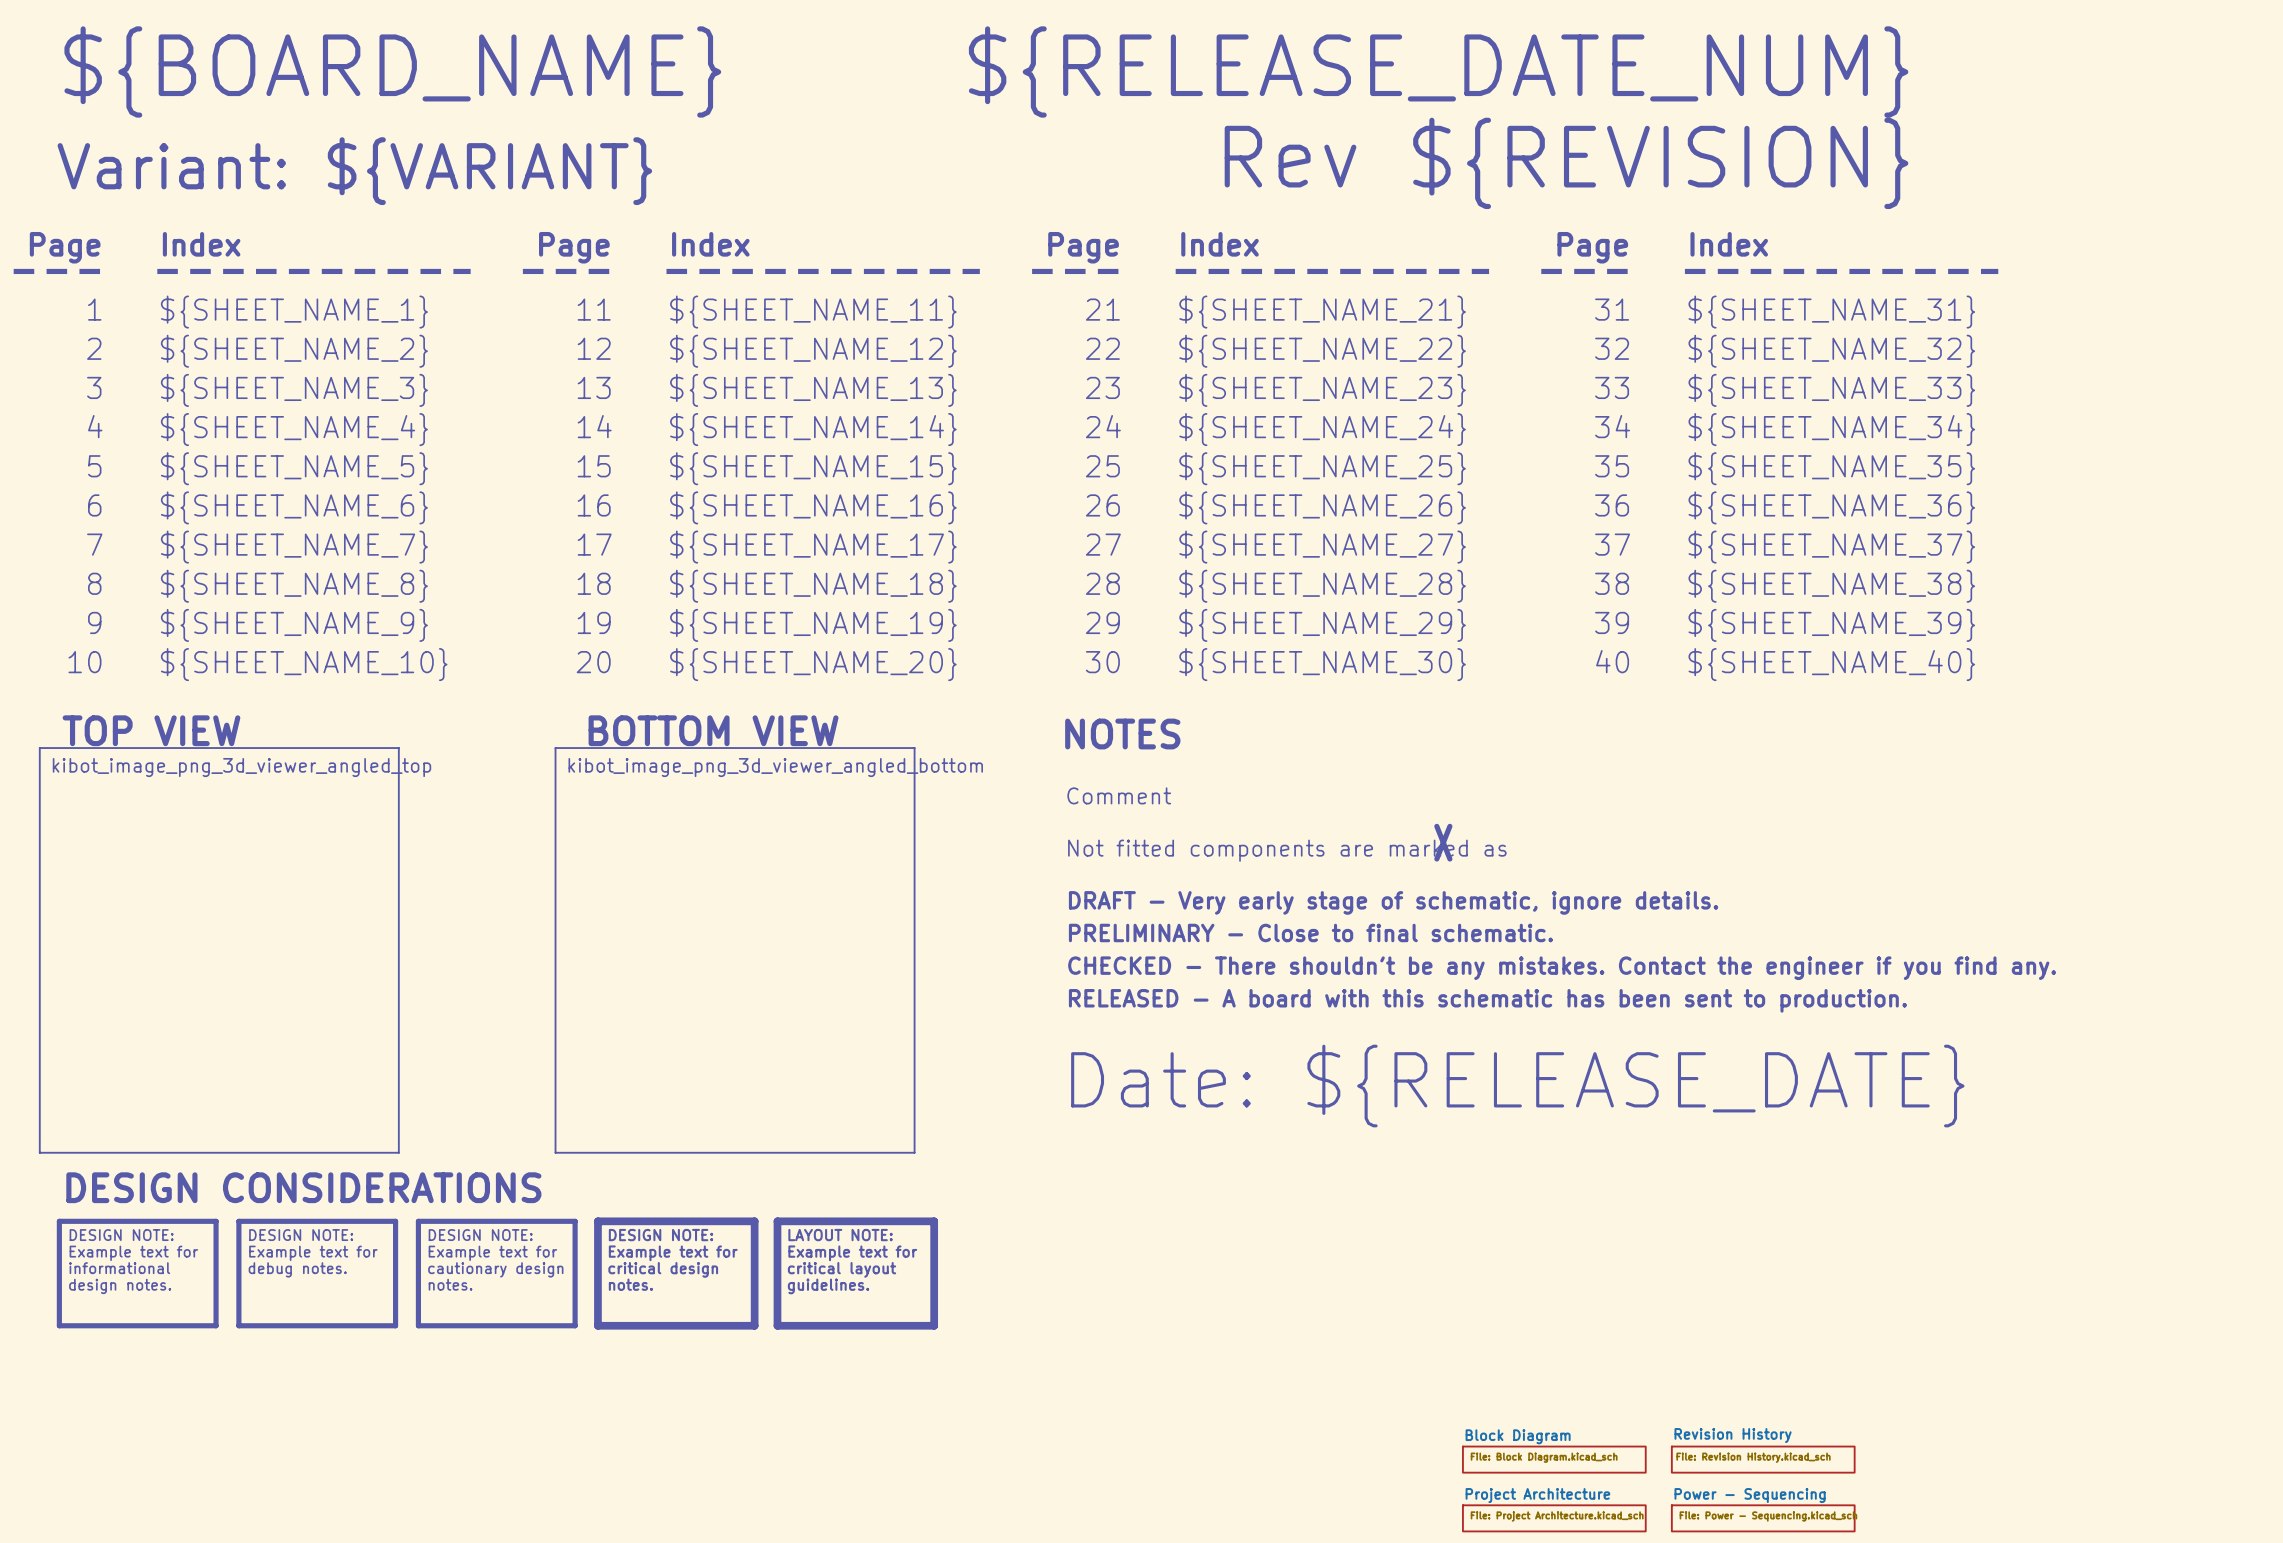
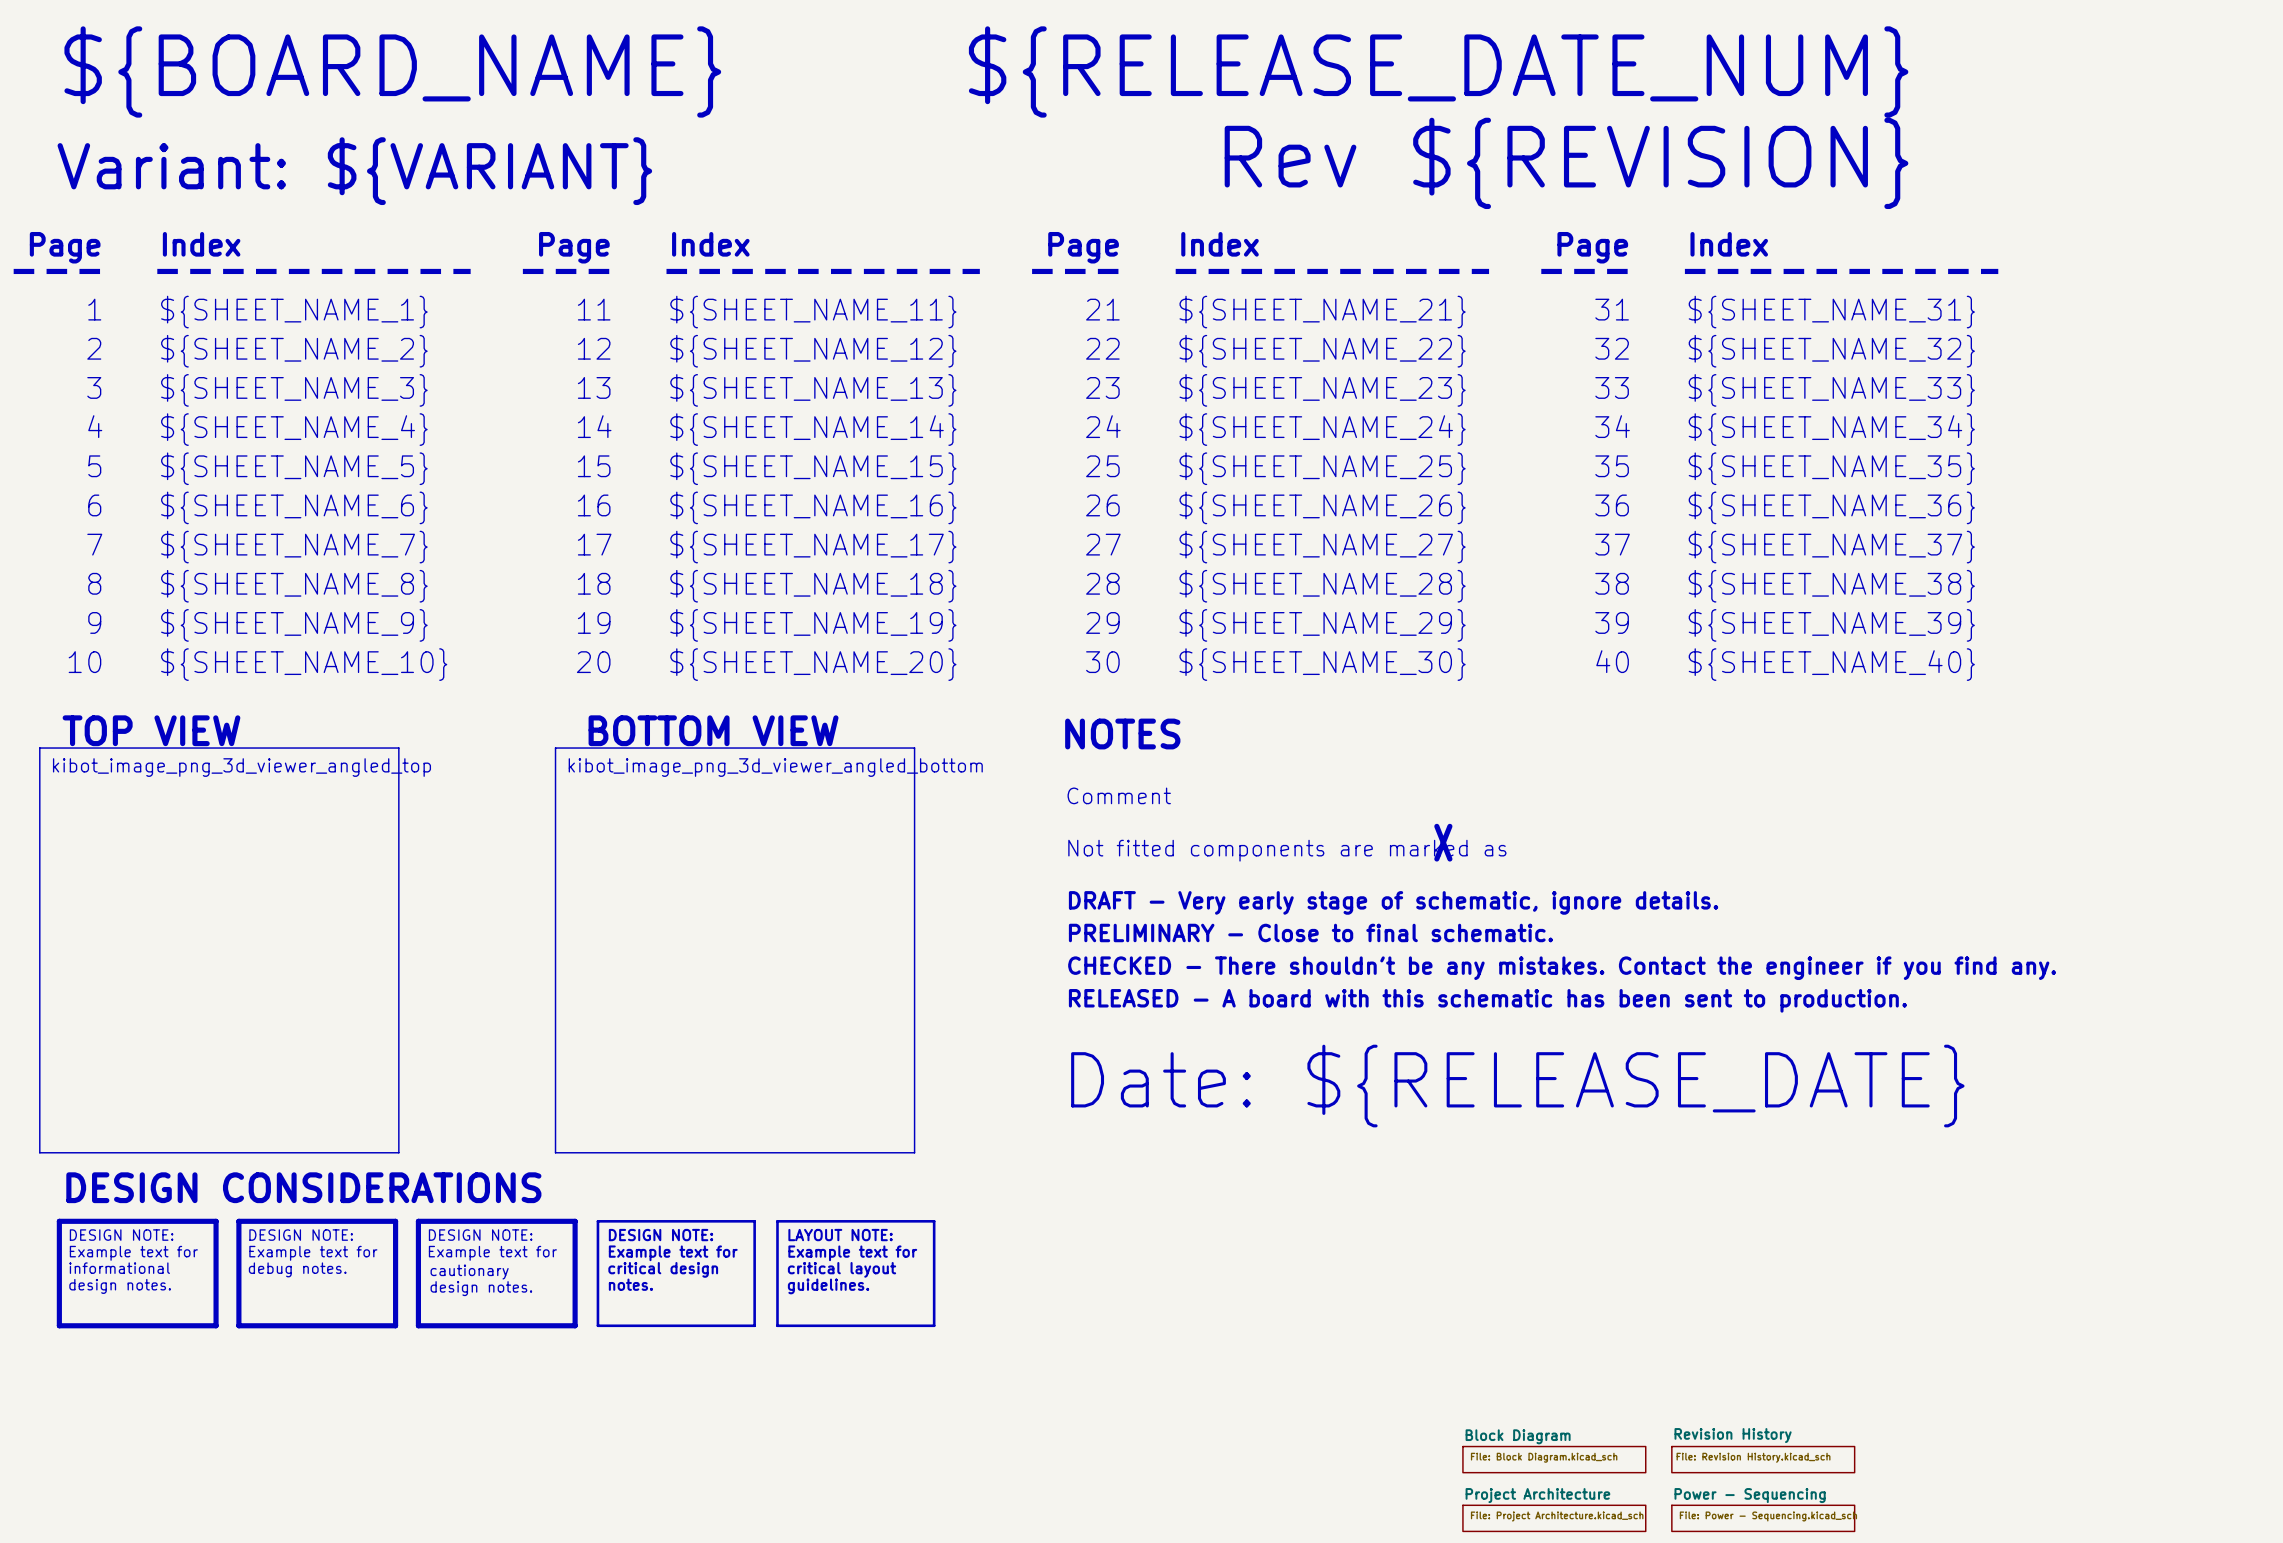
line width: thick (597, 1221) (754, 1221) (754, 1325) (597, 1325) (597, 1221) -> thin (597, 1221) (754, 1221) (754, 1325) (597, 1325) (597, 1221)
line width: thick (777, 1221) (934, 1221) (934, 1325) (777, 1325) (777, 1221) -> thin (777, 1221) (934, 1221) (934, 1325) (777, 1325) (777, 1221)
text: cautionary design (495, 1269) -> cautionary (469, 1272)
text: notes. (450, 1284) -> design notes. (481, 1288)

